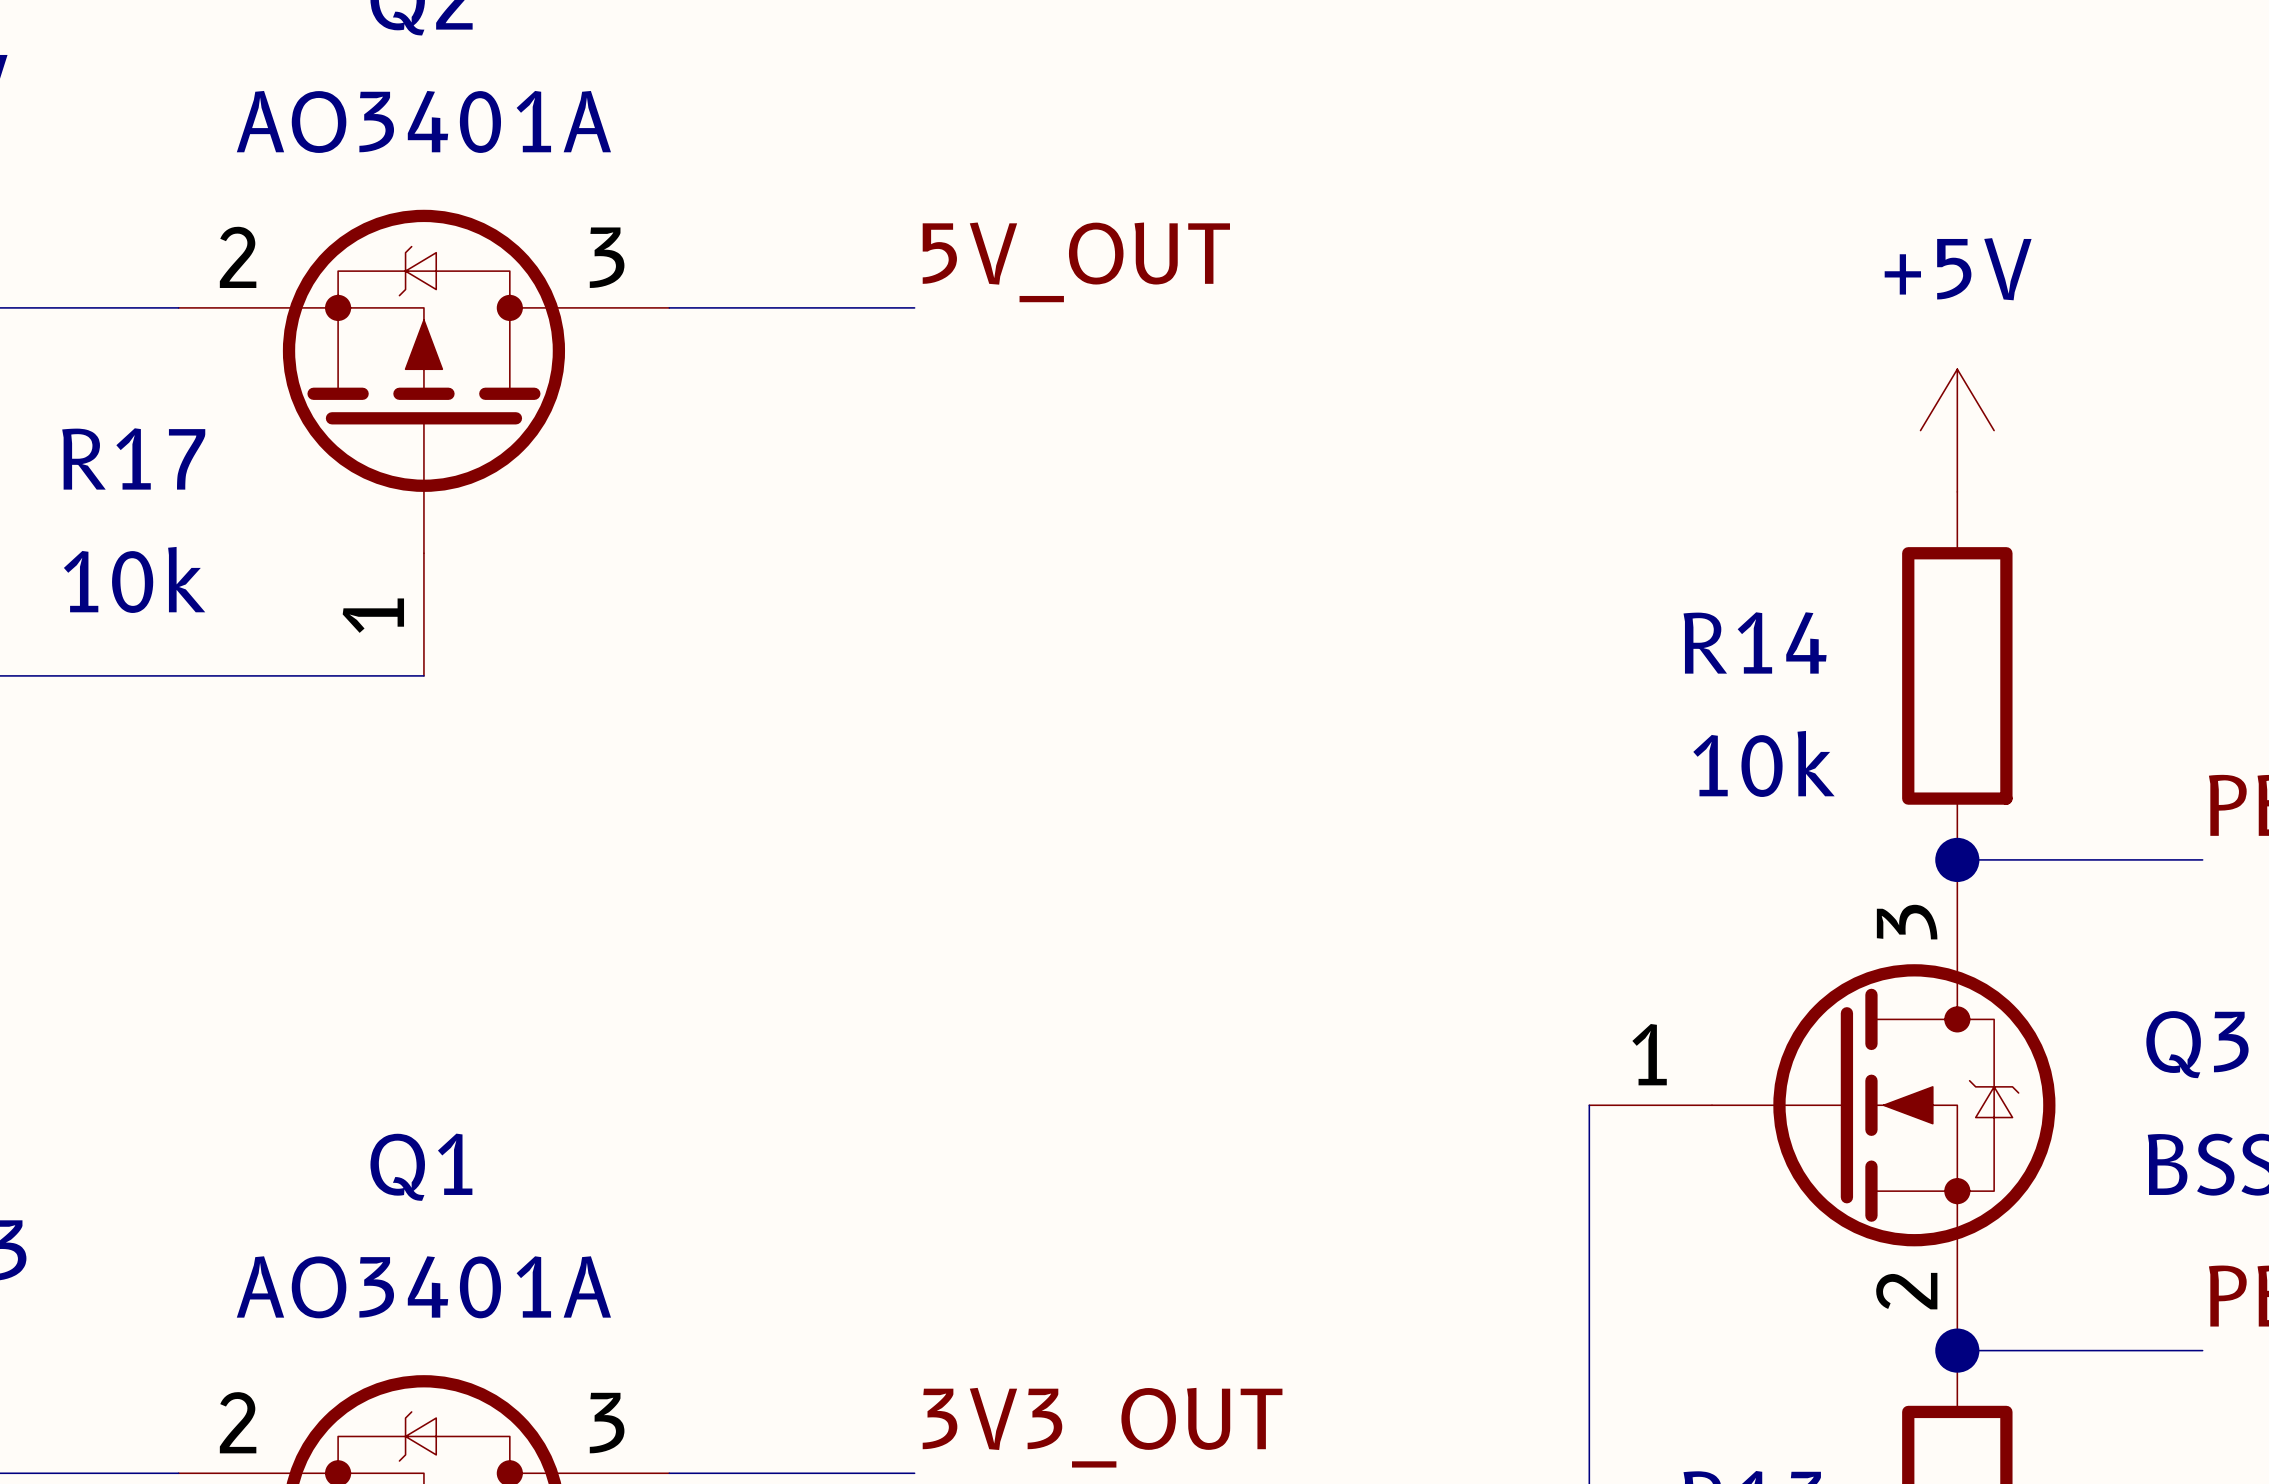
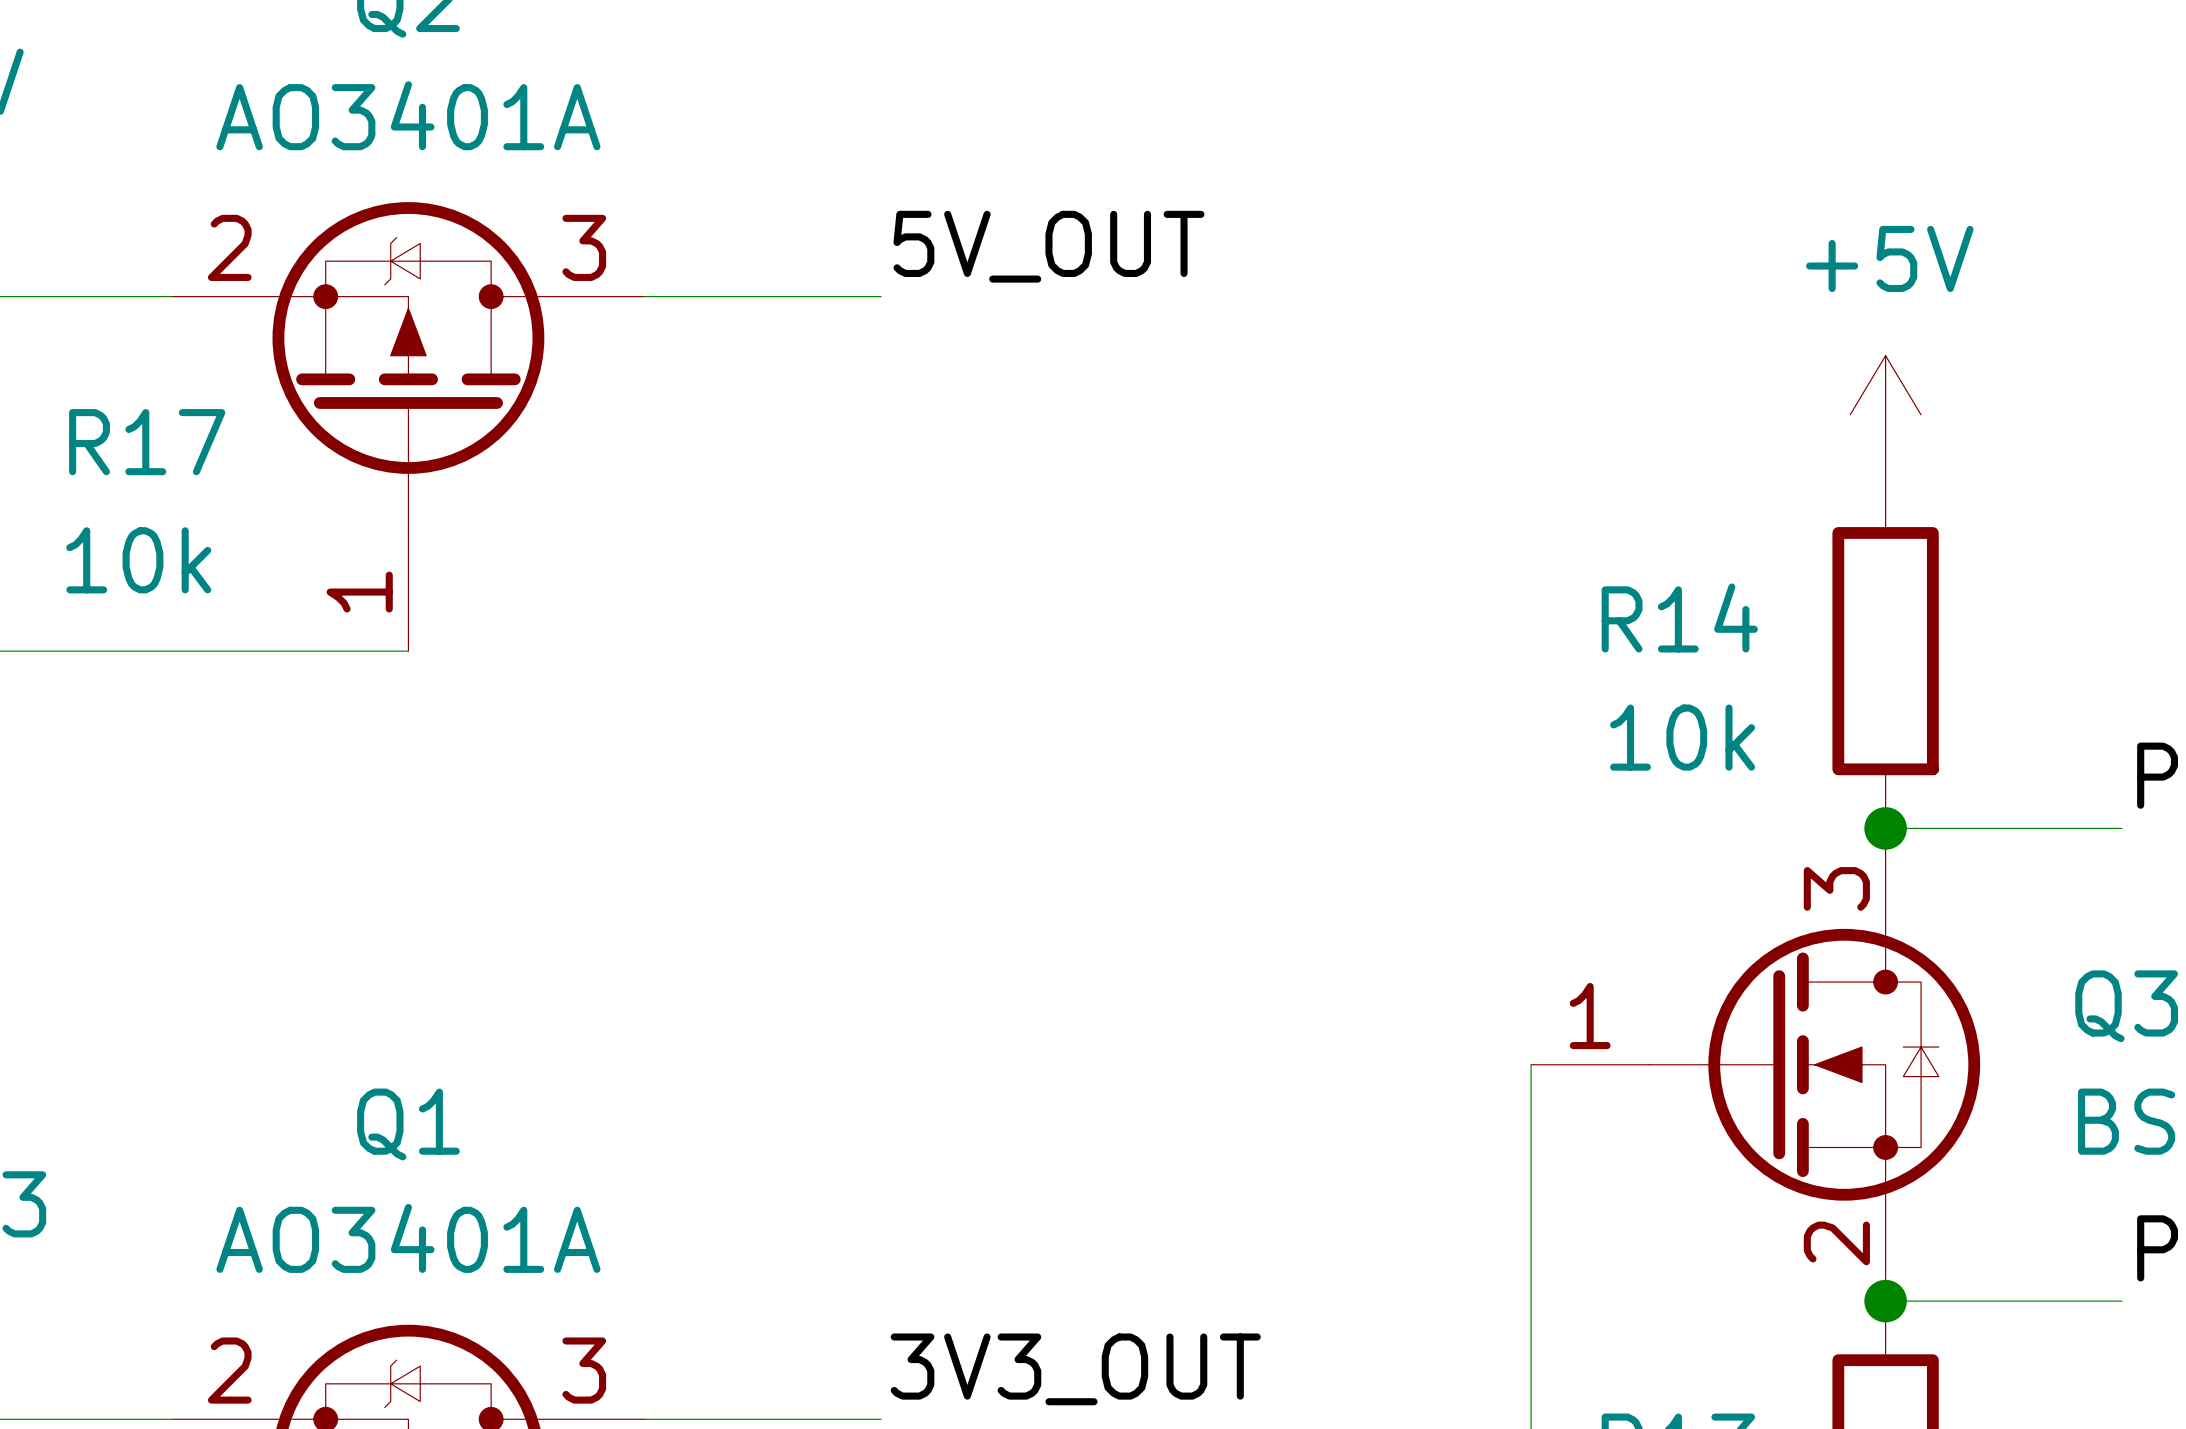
Q3 symbol: [1589, 859, 2056, 1351] -> [1531, 828, 1981, 1302]

